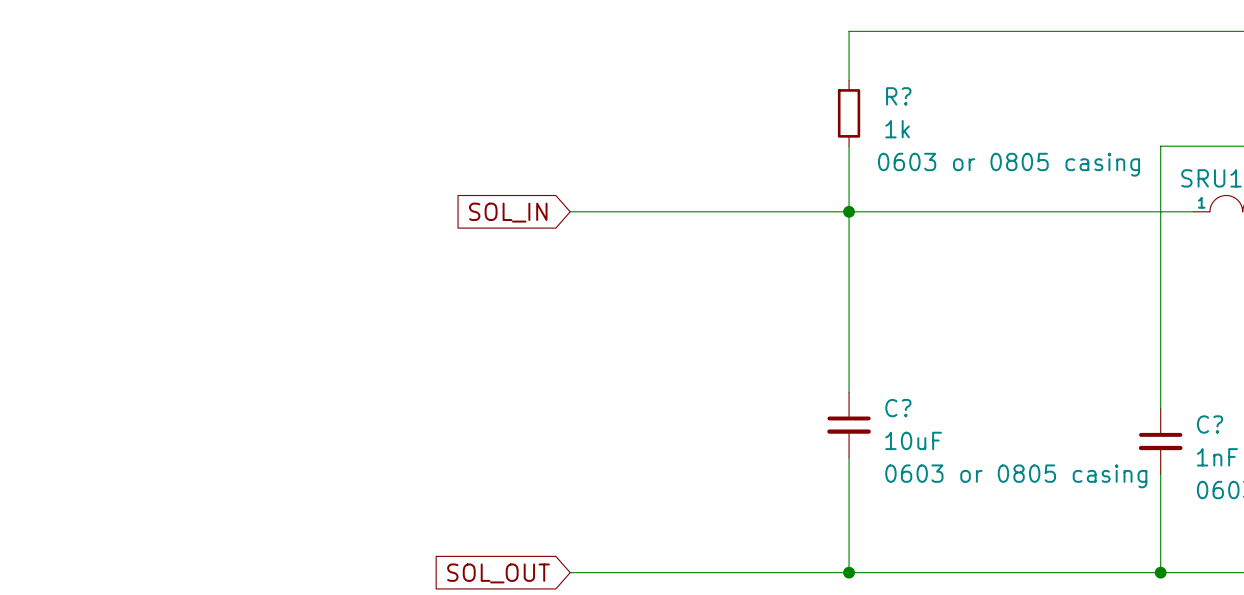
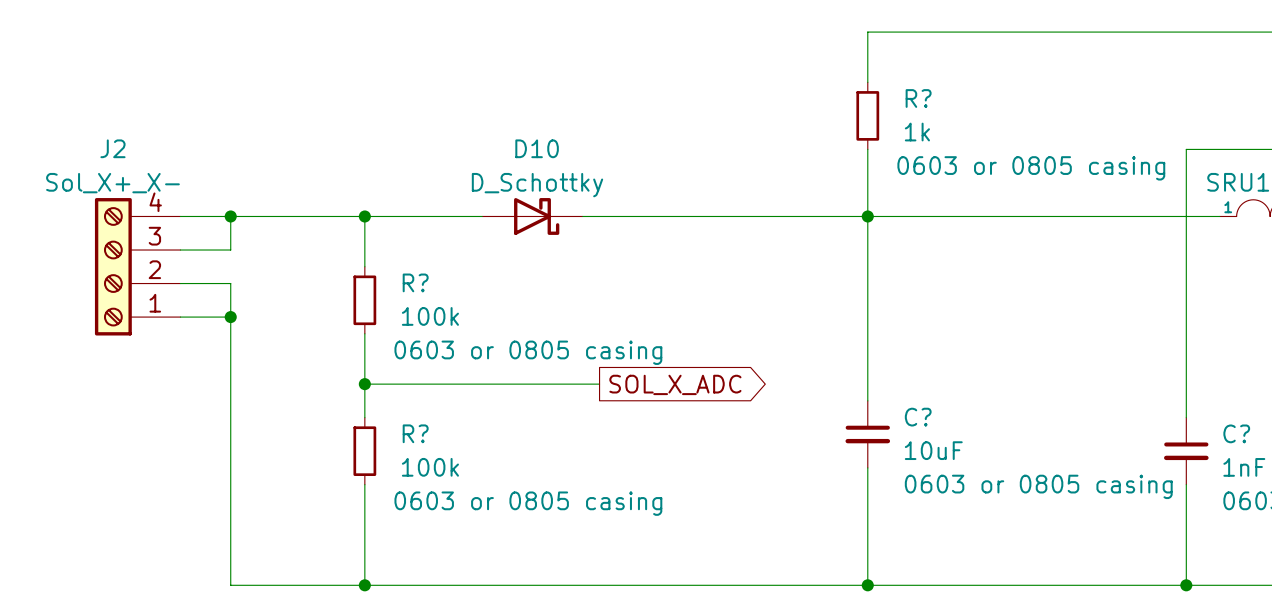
wire: none -> (180, 216) (482, 216)
wire: none -> (230, 216) (230, 250) (180, 250)
junction: none -> (230, 216)
wire: none -> (364, 216) (364, 266)
junction: none -> (364, 216)
D10: none -> D_Schottky (532, 216)
global label: SOL_IN (508, 212) -> none
J2: none -> Sol_X+_X- (137, 266)
wire: none -> (180, 283) (230, 283) (230, 585) (582, 585)
R?: none -> 100k (364, 300)
wire: none -> (180, 317) (230, 317)
junction: none -> (230, 317)
wire: none -> (364, 333) (364, 417)
wire: none -> (364, 384) (599, 384)
junction: none -> (364, 384)
global label: none -> SOL_X_ADC (675, 384)
R?: none -> 100k (364, 451)
wire: none -> (364, 484) (364, 585)
junction: none -> (364, 585)
global label: SOL_OUT (498, 573) -> none

